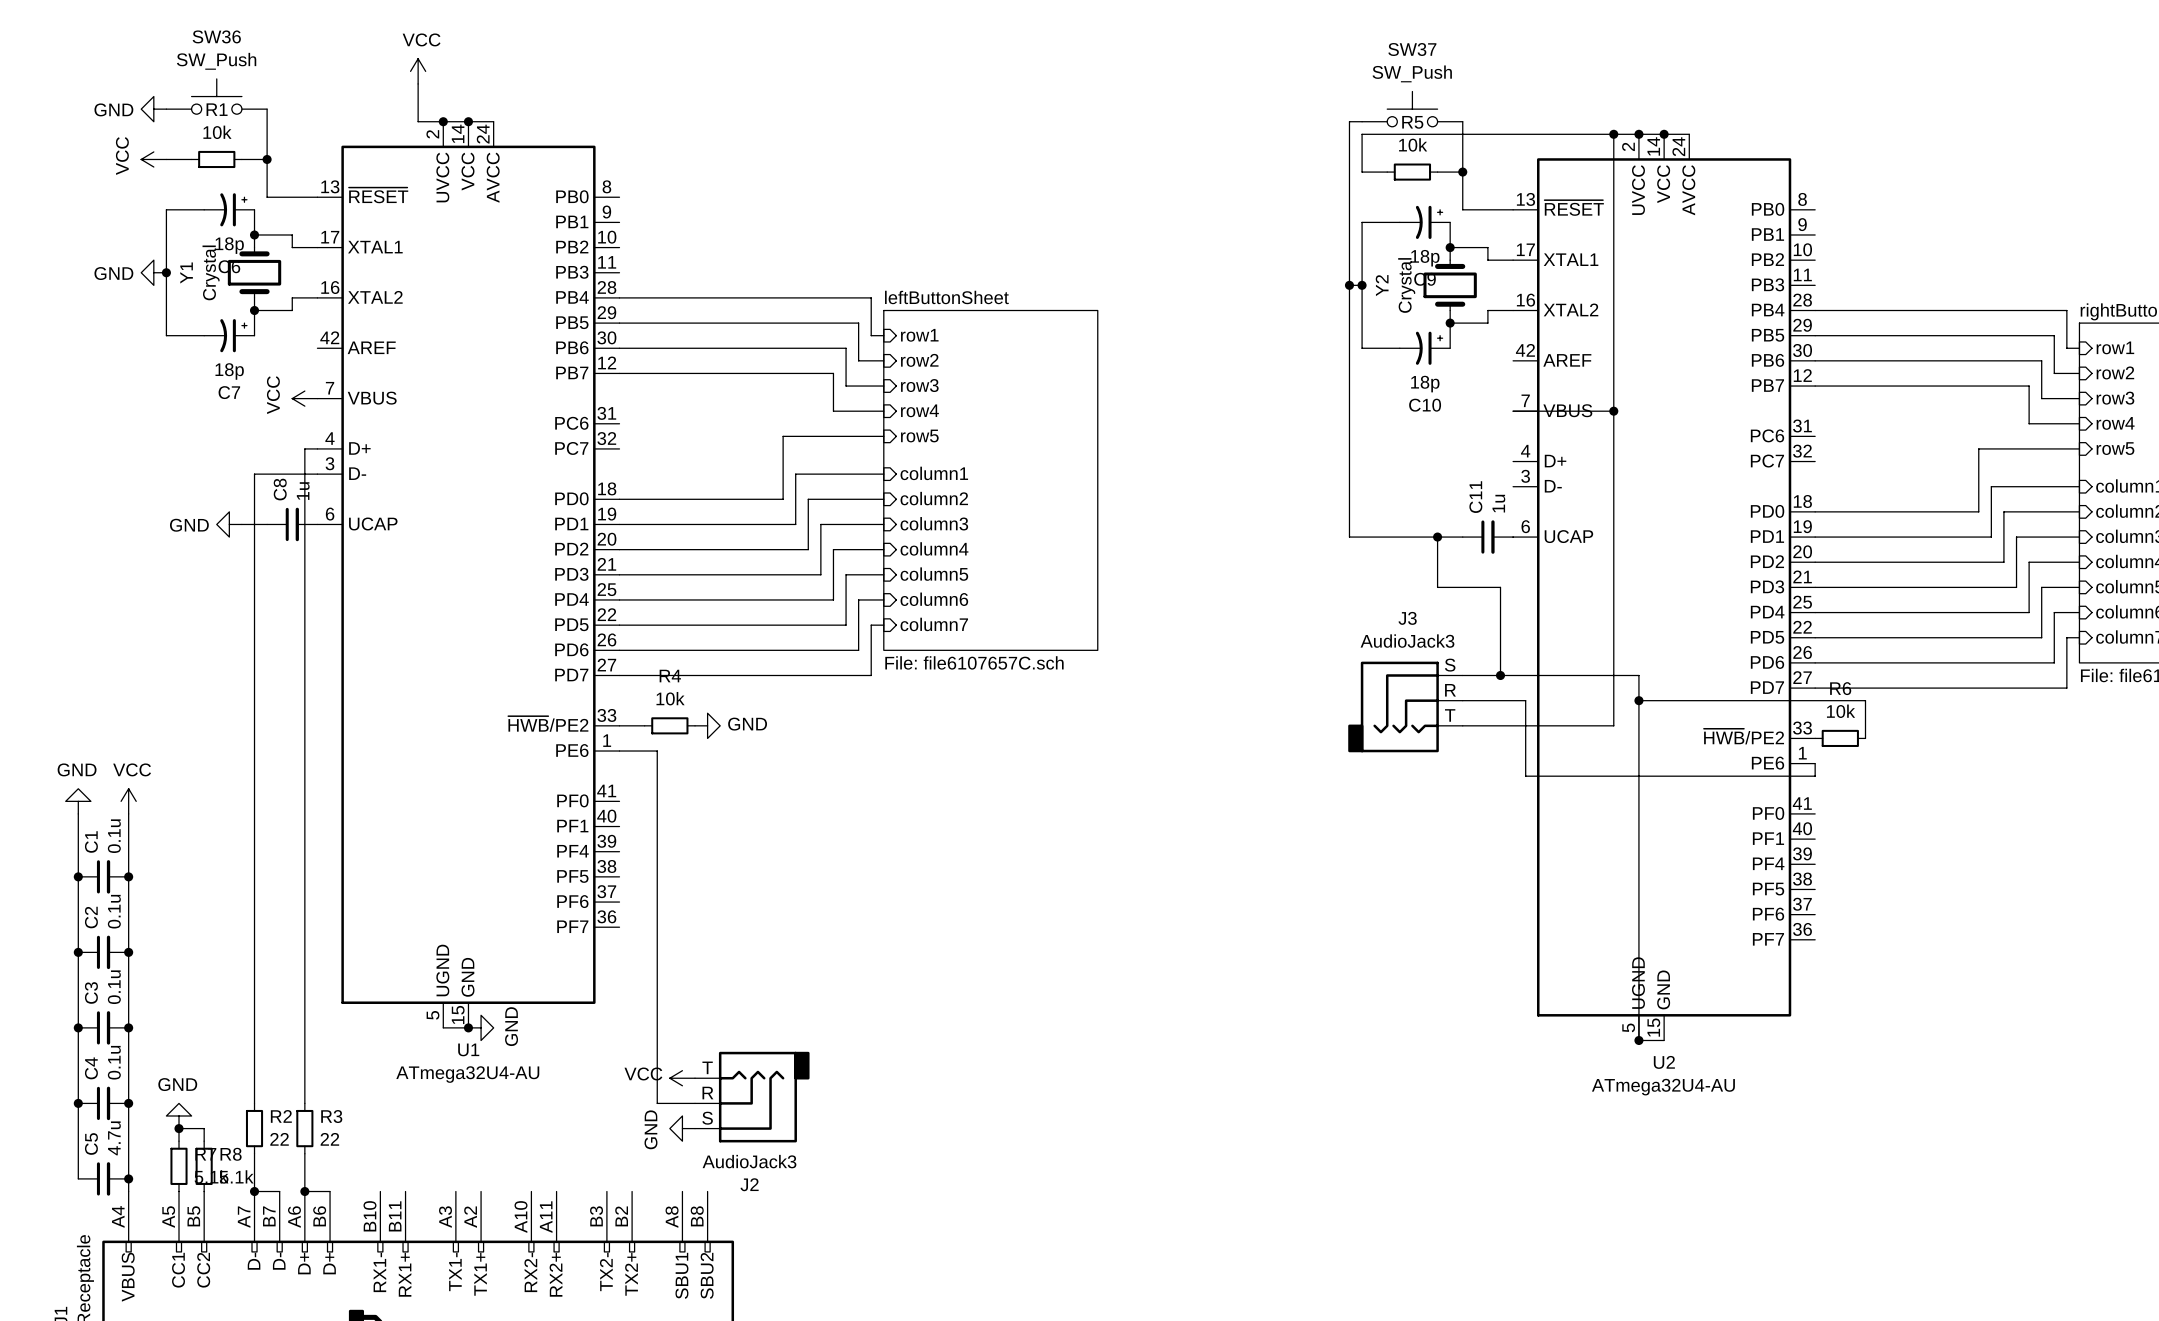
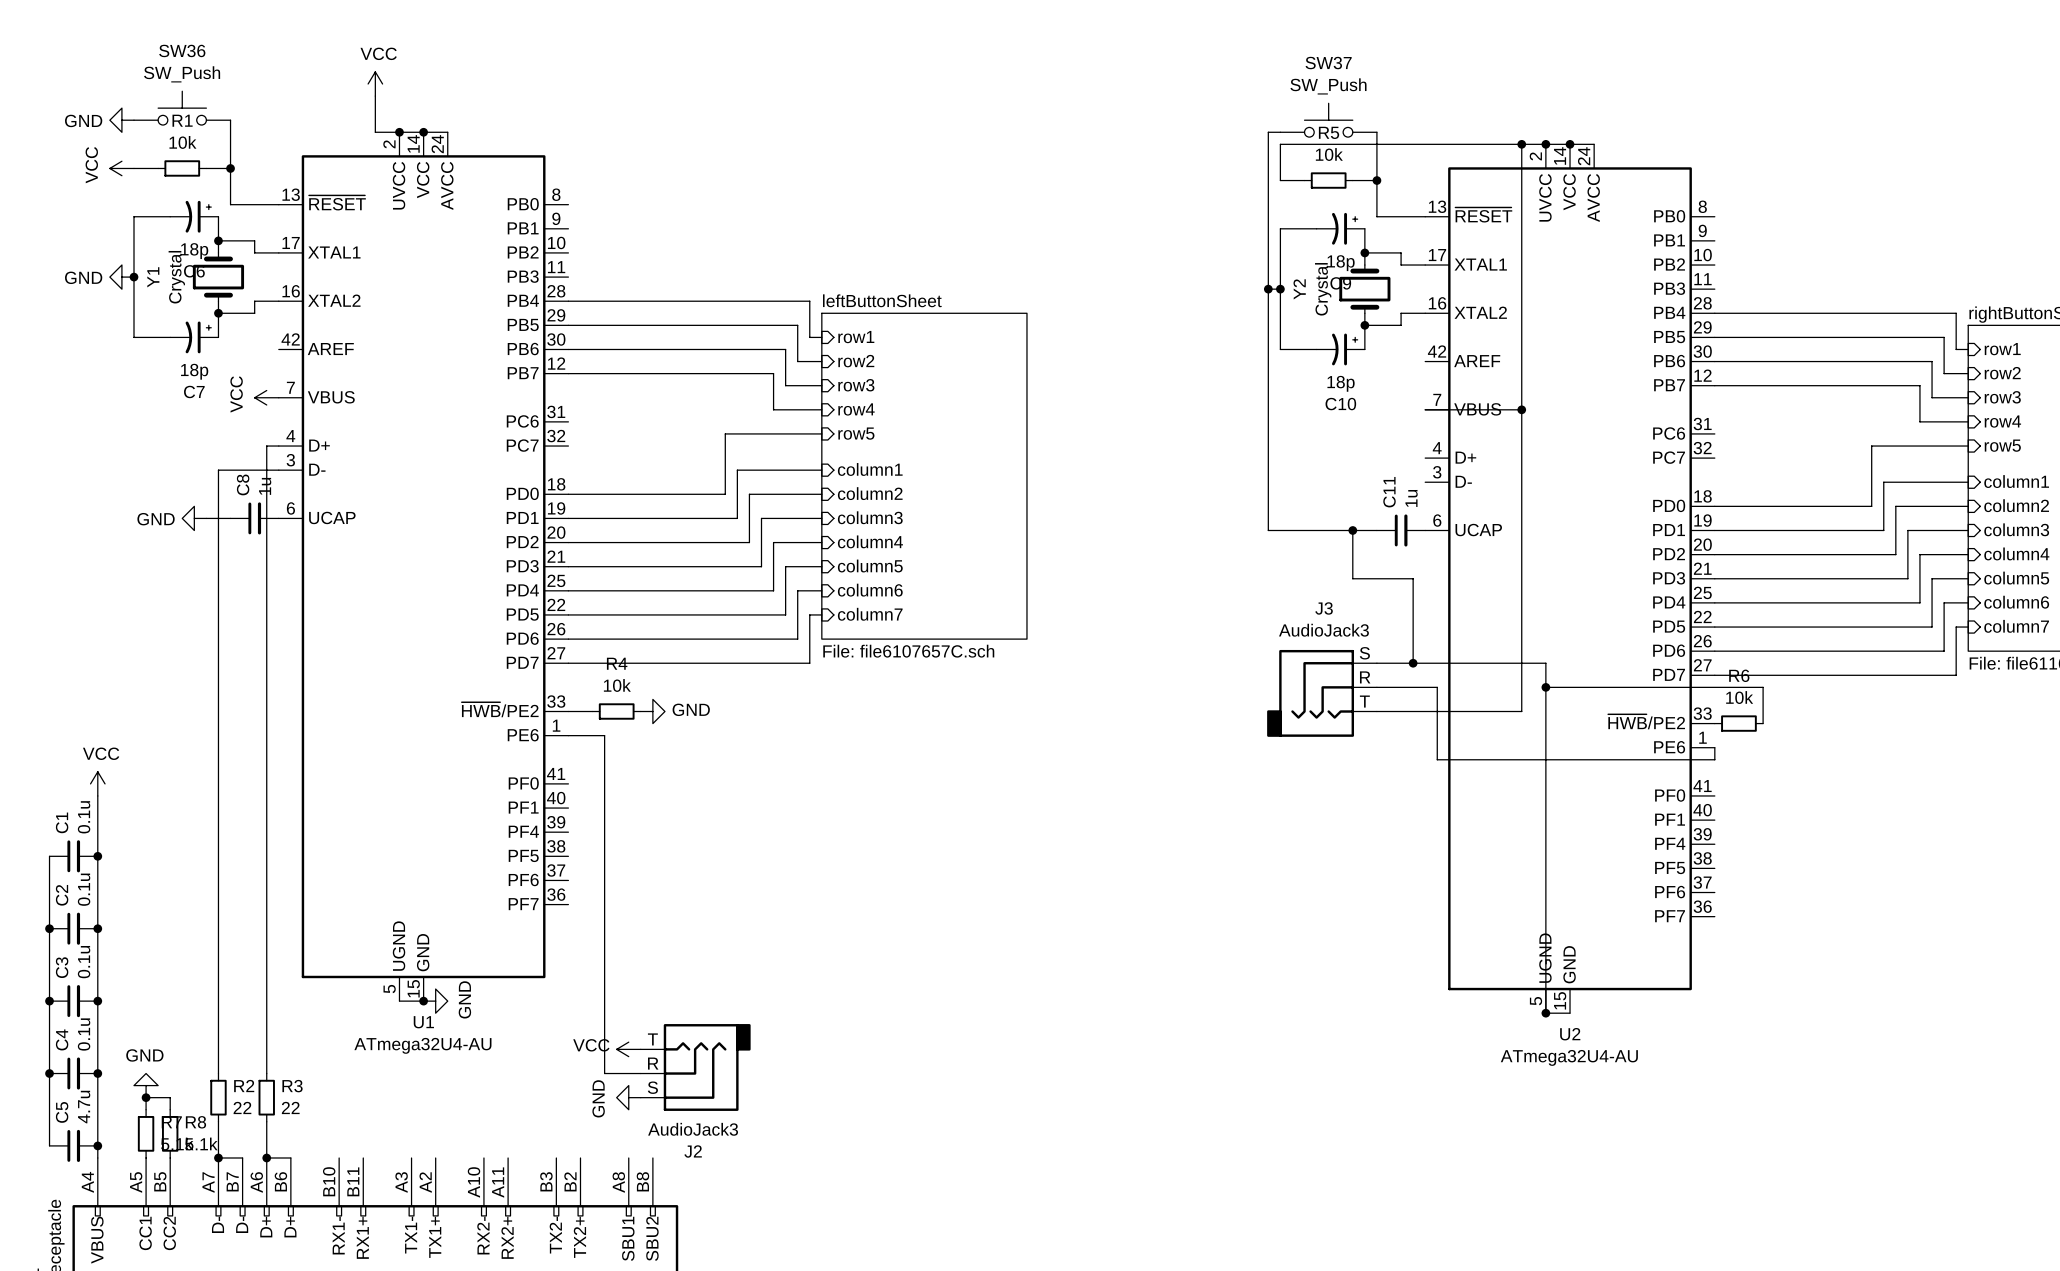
power symbol: GND (78, 801) -> none
wire: (78, 813) (78, 876) -> none
junction: (78, 876) -> none

